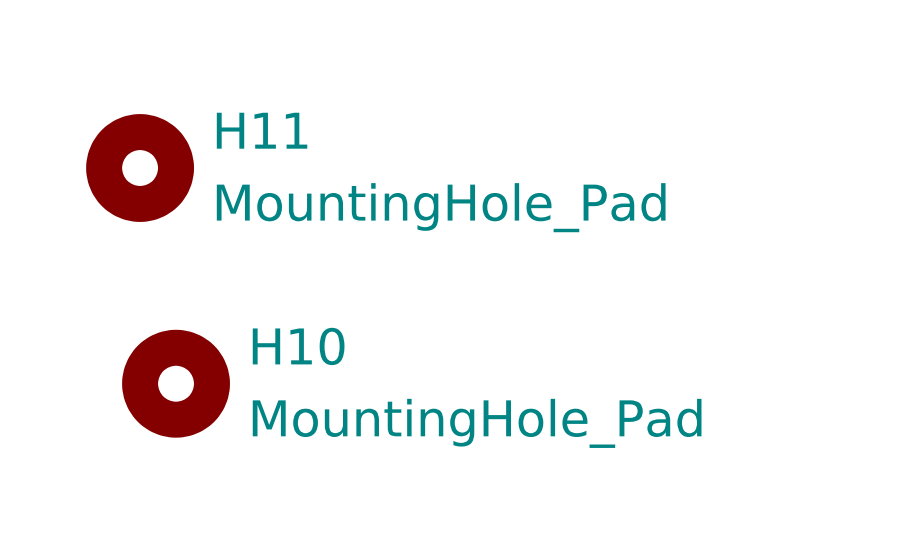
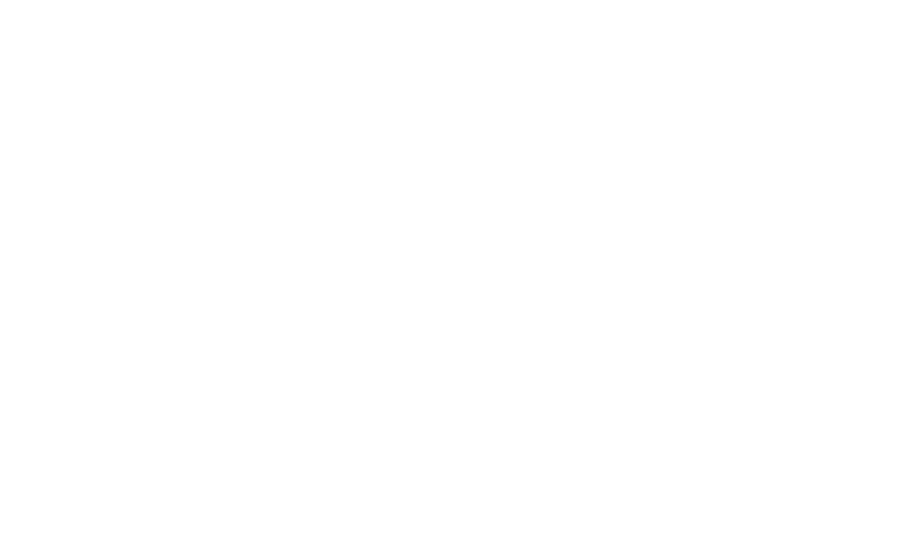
H11: MountingHole_Pad (140, 168) -> none
H10: MountingHole_Pad (176, 383) -> none

